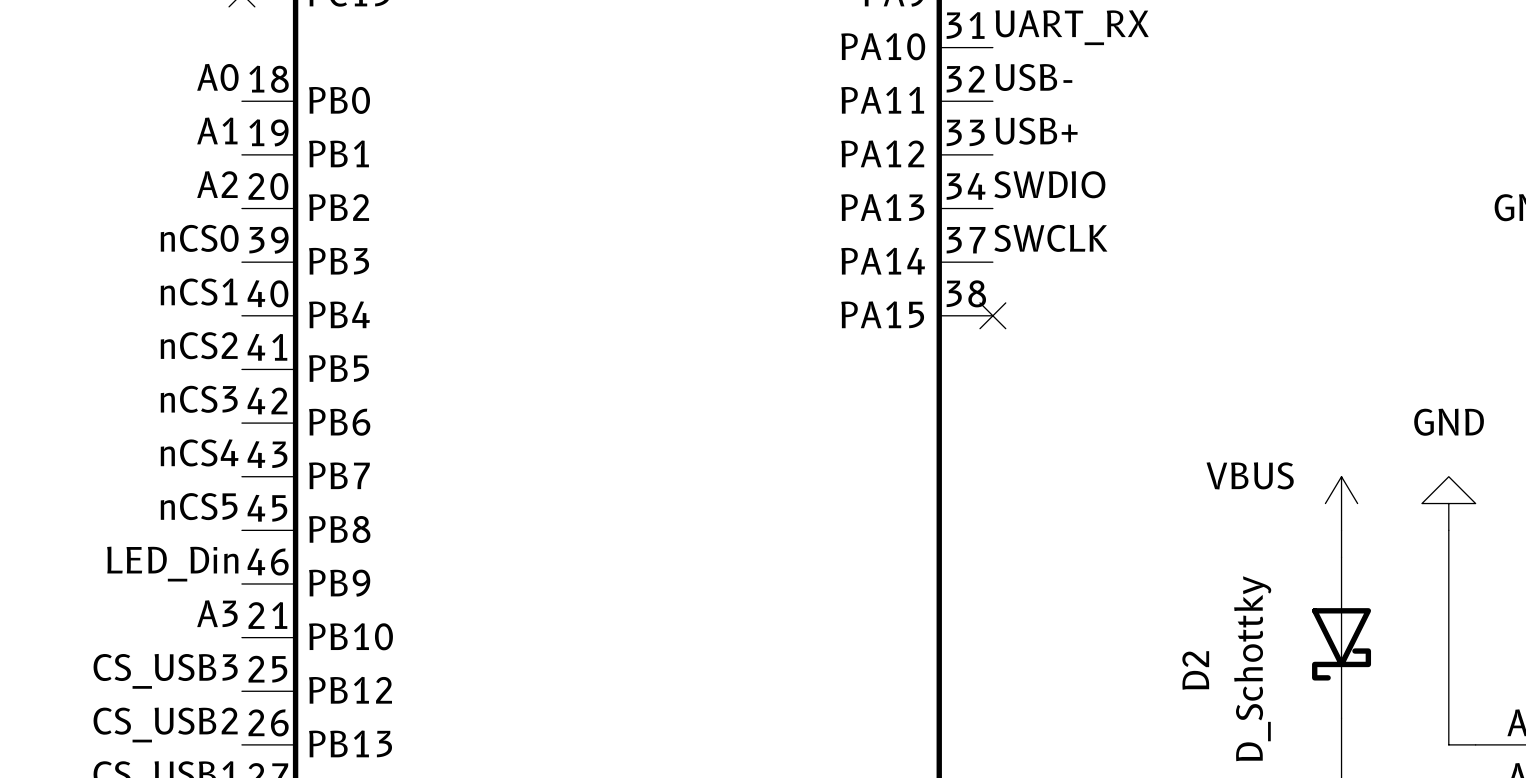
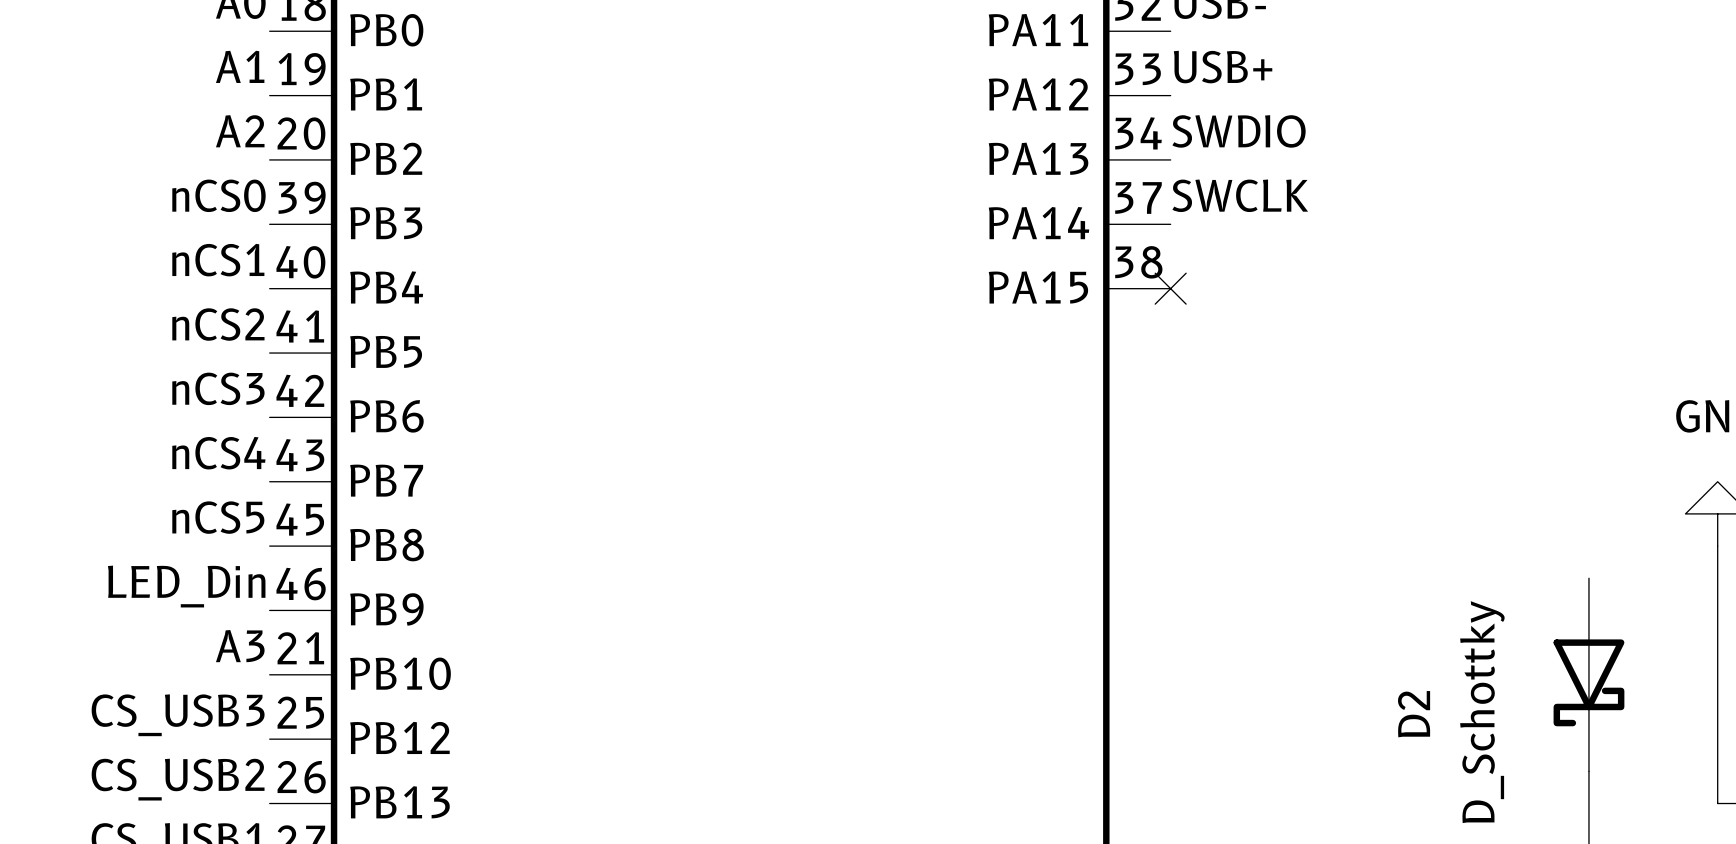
power symbol: VBUS (1341, 503) -> none
wire: (1341, 530) (1341, 557) -> none

